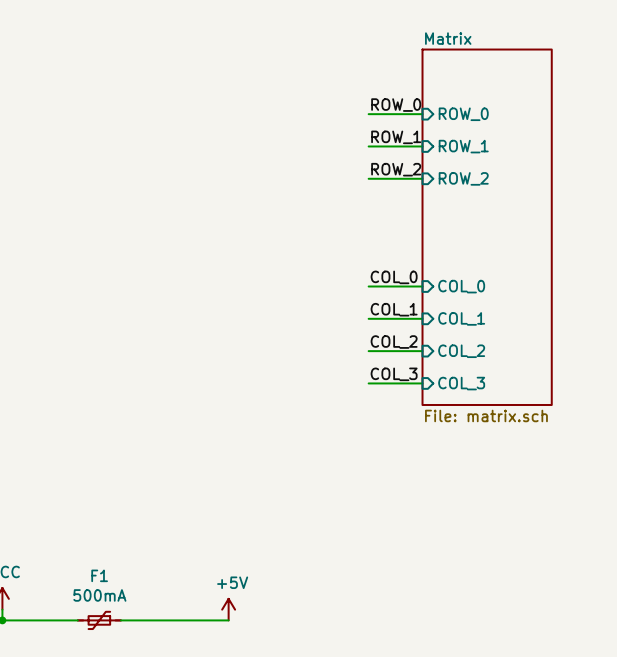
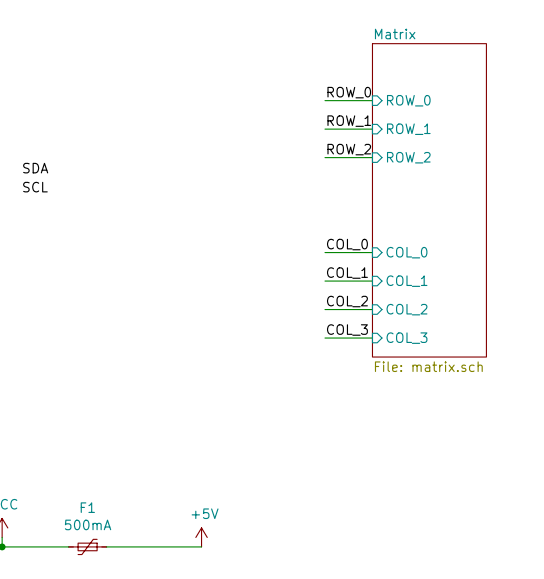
label: none -> SDA (35, 168)
label: none -> SCL (35, 187)

